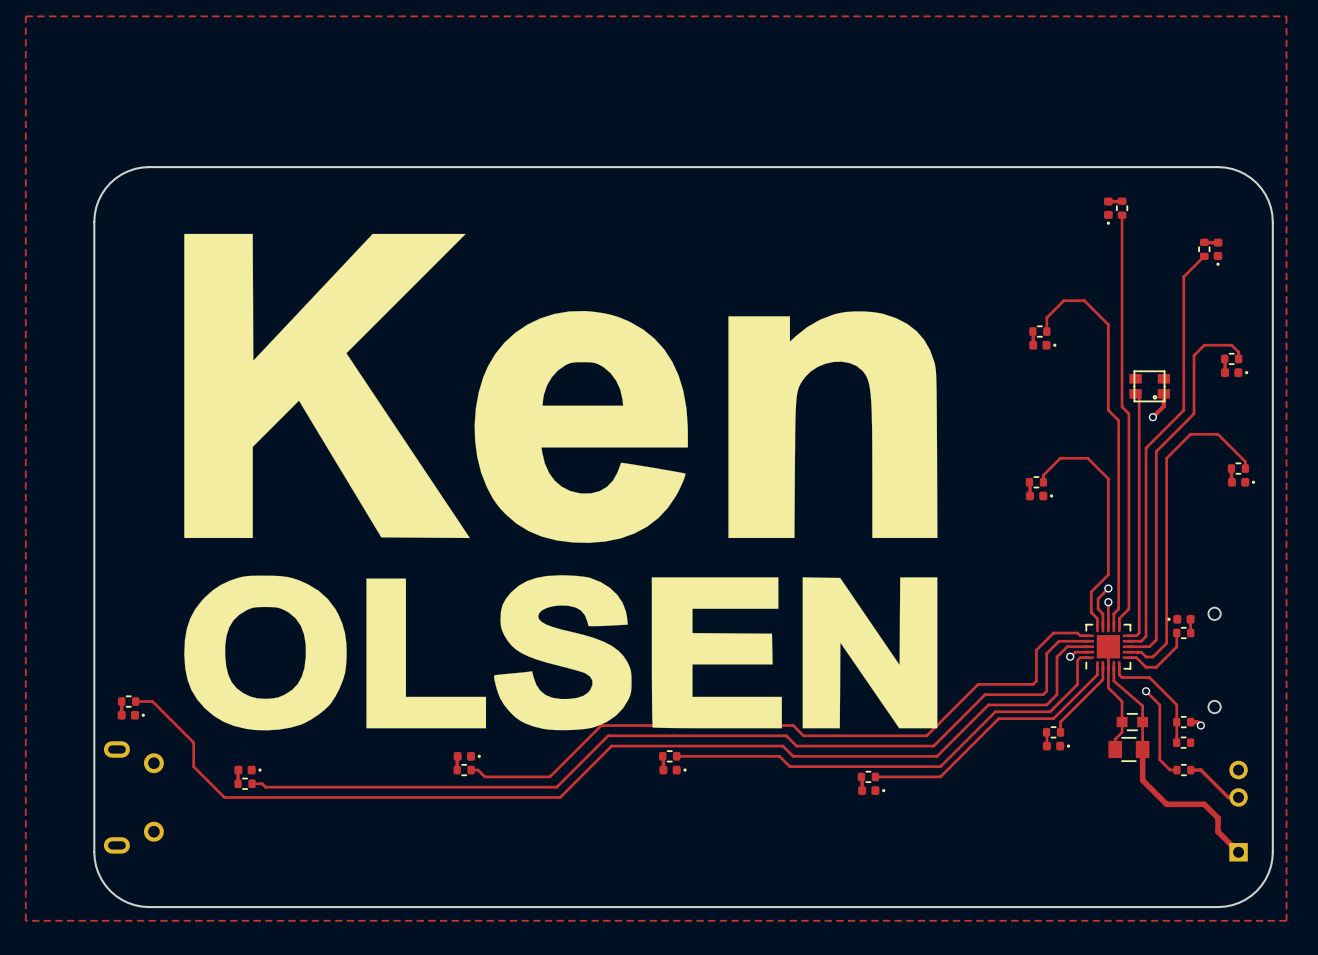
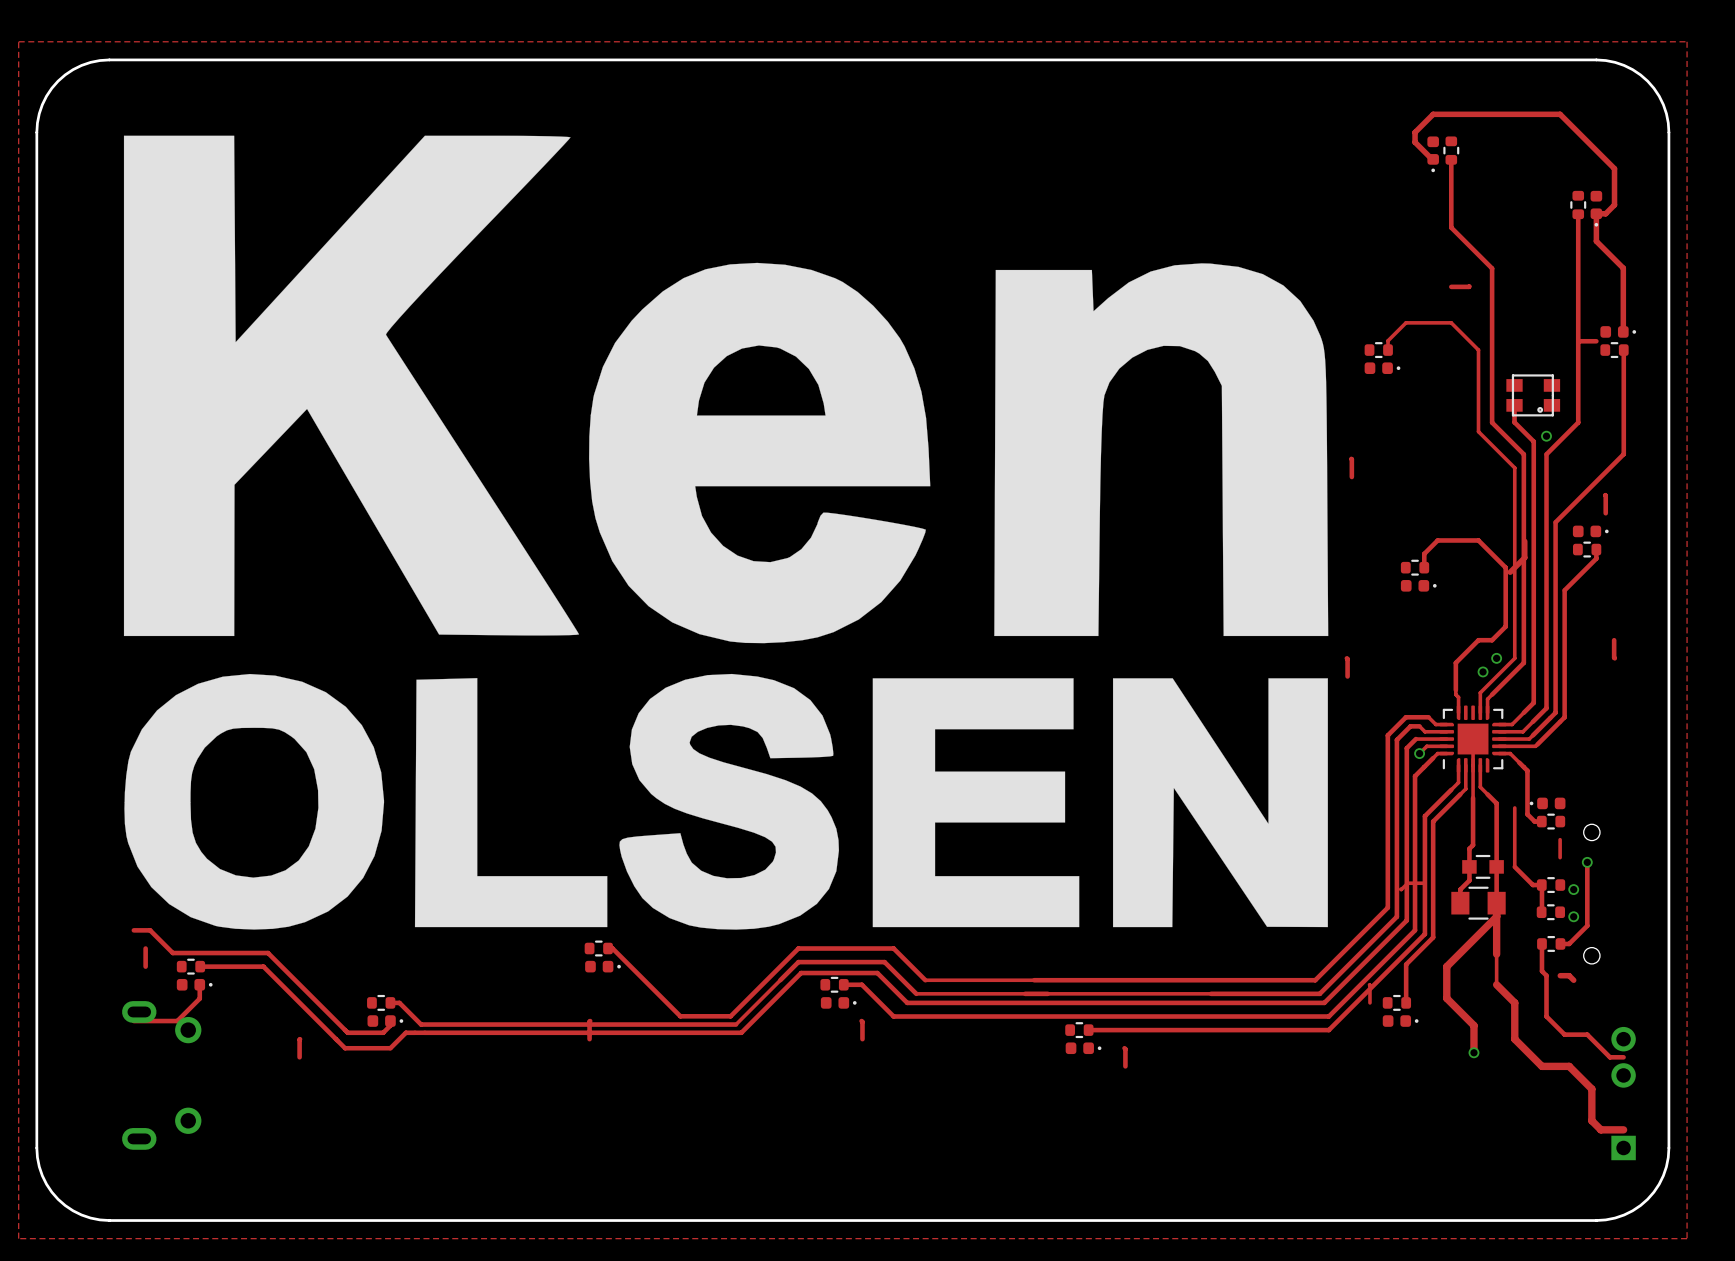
drawing: none -> [123, 135, 1329, 930]
part: none -> (1451, 150)
part: none -> (1433, 154)
track: none -> (1433, 159) (1415, 142) (1415, 132) (1433, 114) (1560, 114) (1614, 168) (1614, 204) (1605, 213) (1596, 213) (1596, 241) (1623, 268) (1623, 331)
track: none -> (1451, 159) (1451, 227) (1492, 268) (1492, 422) (1523, 454) (1523, 662) (1487, 699) (1487, 712)
part: none -> (1578, 204)
part: none -> (1596, 208)
track: none -> (1578, 214) (1578, 422) (1546, 454) (1546, 708) (1522, 731) (1499, 731)
part: (1122, 208) -> none
part: (1108, 211) -> none
track: (1122, 215) (1122, 406) (1128, 413) (1128, 609) (1119, 618) (1119, 626) -> none
board edge: (1272, 221) (1268, 200) (1256, 183) (1238, 171) (1218, 167) (149, 167) (134, 168) (121, 174) (110, 183) (101, 194) (96, 207) (94, 221) (94, 852) (98, 873) (110, 891) (128, 902) (149, 907) -> (1668, 313) (1668, 132) (1666, 113) (1659, 96) (1640, 74) (1624, 65) (1605, 60) (109, 59) (90, 62) (73, 69) (58, 81) (46, 96) (39, 113) (36, 132) (37, 1157) (42, 1175) (51, 1192) (65, 1205) (81, 1214) (109, 1220) (181, 1220)
drawing: [184, 233, 938, 731] -> none
part: none -> (1378, 350)
part rotation: 0° (1204, 249) -> 90° clockwise (1614, 350)
part position: (1204, 249) -> (1614, 350)
track: none -> (1623, 350) (1623, 454) (1555, 522) (1555, 712) (1529, 739) (1499, 739)
part rotation: 0° (1218, 252) -> 90° counterclockwise (1618, 331)
part position: (1218, 252) -> (1618, 331)
track: (1204, 256) (1183, 276) (1183, 410) (1146, 448) (1146, 636) (1141, 641) (1128, 641) -> none
part: none -> (1382, 368)
track: none -> (1514, 405) (1514, 422) (1533, 441) (1533, 702) (1512, 724) (1499, 724)
via: none -> (1546, 436)
part: (1039, 331) -> none
track: (1046, 331) (1046, 317) (1063, 300) (1084, 300) (1108, 324) (1108, 410) (1118, 420) (1118, 609) (1113, 613) (1113, 626) -> none
part: (1042, 345) -> none
part: (1231, 358) -> none
track: (1238, 358) (1238, 352) (1231, 345) (1204, 345) (1194, 355) (1194, 413) (1156, 451) -> (1388, 350) (1388, 340) (1405, 322) (1451, 322) (1478, 350) (1478, 431) (1514, 467) (1514, 617)
part position: (1234, 372) -> (1590, 531)
part position: (1149, 386) -> (1533, 395)
track: (1135, 393) (1139, 397) (1139, 633) (1136, 635) (1128, 635) -> none
part: none -> (1587, 549)
track: none -> (1596, 549) (1596, 558) (1564, 590) (1564, 717) (1535, 746) (1499, 746)
part: none -> (1415, 567)
track: none -> (1424, 567) (1424, 553) (1437, 540) (1478, 540) (1505, 567) (1505, 626) (1492, 640) (1478, 640) (1455, 662) (1455, 694) (1458, 697) (1458, 712)
via: (1152, 417) -> none
part: none -> (1418, 585)
part: (1238, 468) -> none
track: (1245, 468) (1245, 461) (1218, 434) (1190, 434) (1166, 458) (1166, 643) (1152, 656) (1146, 656) (1141, 652) (1128, 652) -> none
part: (1036, 482) -> none
track: (1043, 482) (1043, 475) (1060, 458) (1087, 458) (1108, 478) (1108, 574) (1091, 591) (1091, 612) (1097, 618) (1097, 626) -> none
via: none -> (1496, 658)
track: (1156, 482) (1156, 595) -> (1514, 658) (1480, 692) (1480, 712)
part: (1241, 482) -> none
via: none -> (1483, 671)
part: (1039, 495) -> none
track: none -> (1446, 724) (1435, 724) (1428, 717) (1405, 717) (1387, 735) (1387, 907) (1315, 980) (1034, 980)
track: none -> (1446, 739) (1415, 739) (1406, 748) (1406, 920) (1324, 1002) (907, 1002) (877, 973) (801, 973) (741, 1032) (405, 1032) (390, 1048) (345, 1048) (263, 966) (200, 966)
track: none -> (1473, 739) (1473, 845) (1469, 848) (1469, 880) (1460, 889) (1460, 903)
track: none -> (1446, 746) (1426, 746) (1417, 753)
via: none -> (1419, 753)
track: none -> (1446, 753) (1437, 753) (1415, 776) (1415, 930) (1328, 1016) (893, 1016) (861, 984) (843, 984)
track: none -> (1499, 753) (1510, 753) (1527, 770) (1527, 814) (1534, 821) (1541, 821)
track: none -> (1458, 765) (1458, 782) (1424, 816) (1424, 934) (1328, 1030) (1088, 1030)
track: none -> (1465, 765) (1465, 788) (1433, 821) (1433, 937) (1406, 964) (1406, 1002)
track: (1108, 588) (1098, 598) (1098, 609) (1102, 613) (1102, 626) -> none
via: (1108, 588) -> none
track: (1108, 602) (1108, 626) -> none
via: (1108, 602) -> none
part: none -> (1551, 821)
part position: (1181, 619) -> (1547, 803)
track: (1176, 633) (1176, 646) (1156, 667) (1146, 667) (1136, 657) (1128, 657) -> none
part: (1183, 633) -> none
track: (1088, 635) (1080, 635) (1077, 633) (1053, 633) (1036, 650) (1036, 680) (1033, 684) (978, 684) (926, 735) -> (1446, 731) (1425, 731) (1419, 726) (1410, 726) (1396, 739) (1396, 916) (1319, 993) (1211, 993)
track: none -> (1587, 862) (1587, 925) (1569, 943) (1560, 943)
via: none -> (1587, 862)
track: (1156, 639) (1149, 646) (1128, 646) -> (1514, 866) (1532, 885) (1541, 885)
track: (1088, 641) (1059, 641) (1046, 653) (1046, 691) (1043, 694) (985, 694) (933, 746) (796, 746) (786, 735) -> none
track: (1088, 646) (1067, 646) (1056, 656) (1056, 694) (1046, 704) (988, 704) (937, 756) (793, 756) (782, 746) (611, 746) (560, 797) (224, 797) (193, 766) (193, 742) (152, 701) (135, 701) -> none
track: (1108, 646) (1108, 687) (1122, 701) (1122, 732) (1115, 739) (1115, 749) -> none
part position: (1108, 646) -> (1473, 739)
track: none -> (1541, 885) (1541, 912)
part: none -> (1551, 885)
via: (1070, 656) -> none
via: none -> (1573, 889)
track: (1088, 657) (1080, 657) (1077, 660) (1077, 684) (1050, 711) (995, 711) (940, 766) (789, 766) (779, 756) (676, 756) -> none
track: (1097, 666) (1097, 674) (1053, 718) (998, 718) (940, 776) (875, 776) -> none
track: (1102, 666) (1102, 679) (1060, 721) (1060, 728) -> none
track: (1113, 666) (1113, 680) (1142, 705) -> (1480, 765) (1480, 787) (1496, 803) (1496, 954)
track: (1119, 666) (1119, 674) (1122, 677) (1149, 677) (1176, 704) (1176, 742) -> none
part: none -> (1550, 912)
track: none -> (1496, 916) (1446, 966) (1446, 998) (1473, 1025) (1473, 1052)
via: none -> (1573, 916)
track: none -> (133, 930) (150, 930) (172, 953) (268, 953) (347, 1032) (383, 1032) (390, 1025) (390, 1021)
track: (1146, 691) (1159, 704) (1159, 759) (1170, 770) (1176, 770) -> none
via: (1146, 691) -> none
track: none -> (1541, 943) (1541, 971) (1546, 975) (1546, 1016) (1564, 1034) (1587, 1034) (1609, 1057) (1623, 1057)
part: none -> (1551, 943)
part position: (128, 701) -> (190, 966)
track: none -> (608, 948) (612, 948) (680, 1016) (730, 1016) (798, 948) (893, 948) (925, 980)
part position: (131, 715) -> (194, 984)
part position: (1132, 722) -> (1483, 866)
part: (1183, 722) -> none
track: (601, 725) (710, 725) -> (780, 980) (798, 962) (884, 962) (916, 993)
track: (793, 725) (803, 735) -> (1025, 993) (1047, 993)
via: (1200, 725) -> none
track: none -> (199, 984) (199, 998) (177, 1021) (133, 1021)
track: (1142, 728) (1142, 780) (1166, 804) (1204, 804) (1218, 818) (1218, 831) (1238, 852) -> (1496, 984) (1514, 1002) (1514, 1039) (1541, 1066) (1569, 1066) (1591, 1089) (1591, 1120) (1600, 1129) (1623, 1129)
part position: (1053, 732) -> (1396, 1002)
track: (704, 735) (608, 735) (556, 787) (265, 787) (262, 783) (252, 783) -> none
part: none -> (381, 1002)
part: (1183, 742) -> none
part position: (1056, 746) -> (1400, 1021)
part position: (1128, 749) -> (1478, 903)
part: none -> (385, 1021)
part position: (467, 756) -> (602, 966)
part position: (669, 756) -> (834, 984)
track: (567, 758) (549, 776) (484, 776) (478, 770) (471, 770) -> (736, 1024) (421, 1024) (399, 1002) (390, 1002)
part: (247, 770) -> none
part position: (464, 770) -> (598, 948)
part position: (672, 770) -> (838, 1002)
part: (1183, 770) -> none
track: (1190, 770) (1200, 770) (1228, 797) (1238, 797) -> none
part position: (868, 776) -> (1079, 1030)
via: none -> (1473, 1052)
part: (245, 783) -> none
part position: (871, 790) -> (1083, 1048)

